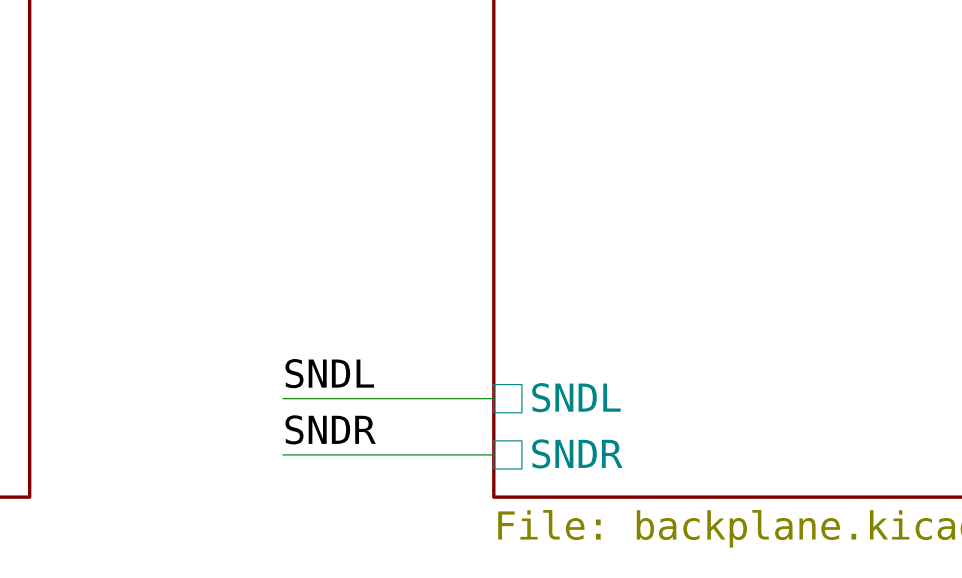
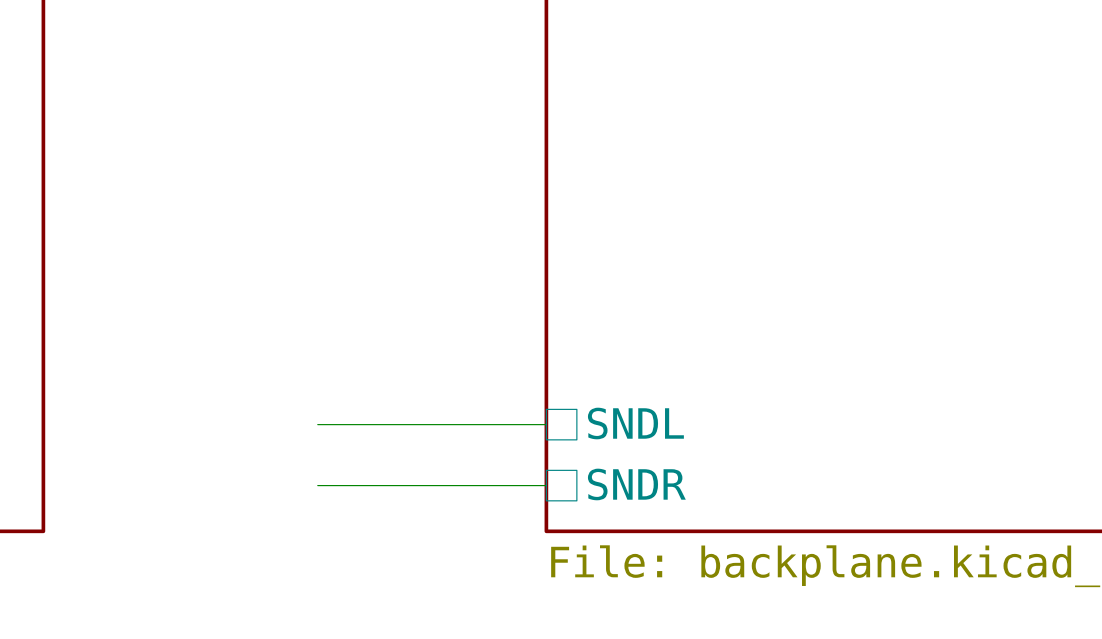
label: SNDL (329, 373) -> none
label: SNDR (330, 429) -> none

